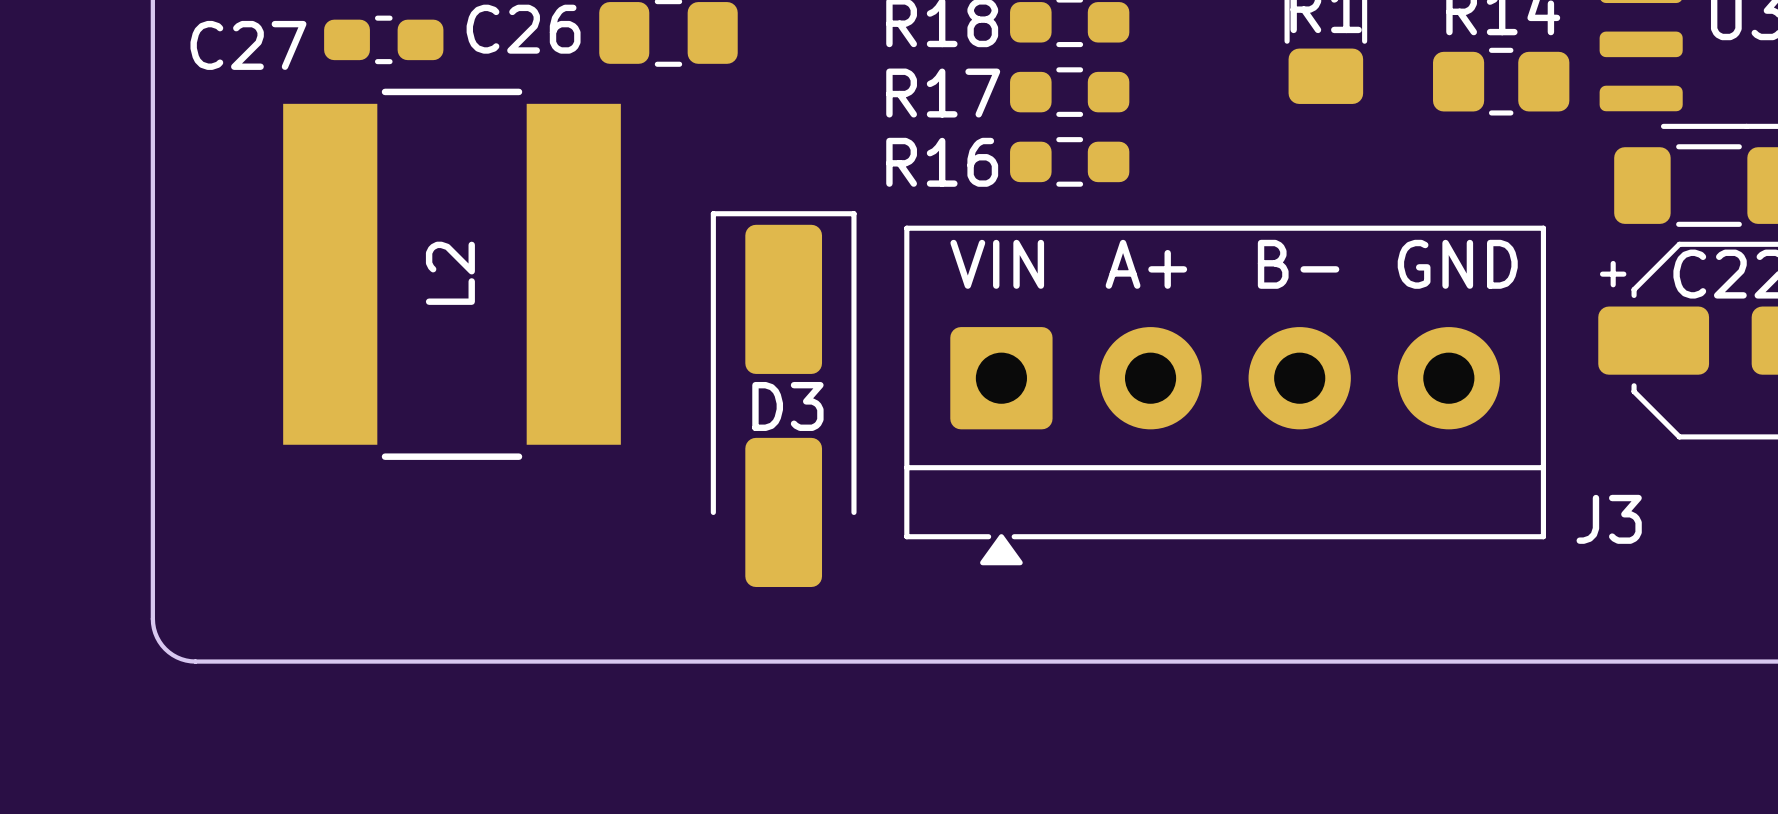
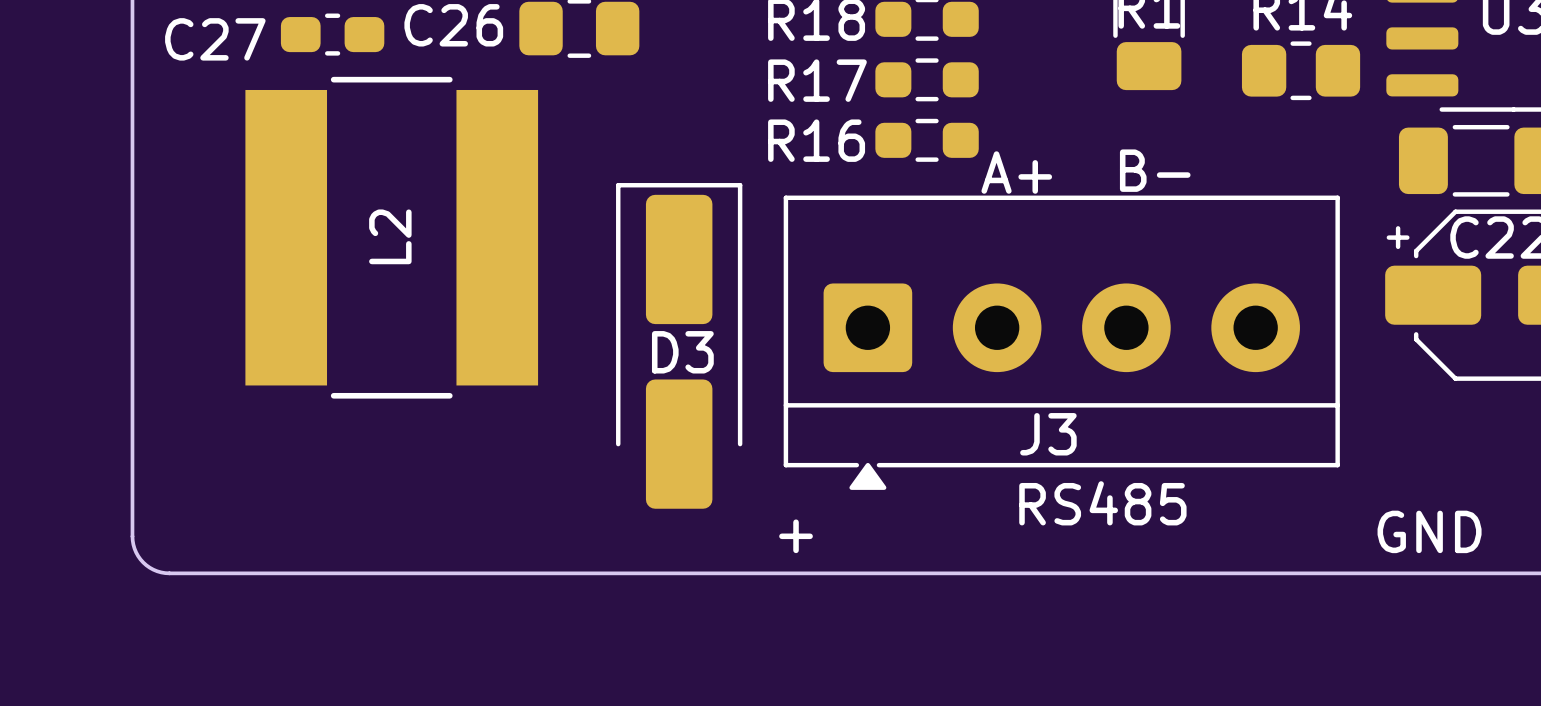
text: VIN (997, 264) -> none
text position: A+ (1146, 264) -> A+ (1016, 172)
text position: B- (1298, 264) -> B- (1155, 170)
text position: GND (1457, 264) -> GND (1429, 531)
J3 name position: J3 (1609, 519) -> J3 (1048, 434)
text: none -> RS485 (1102, 503)
text: none -> + (796, 536)

